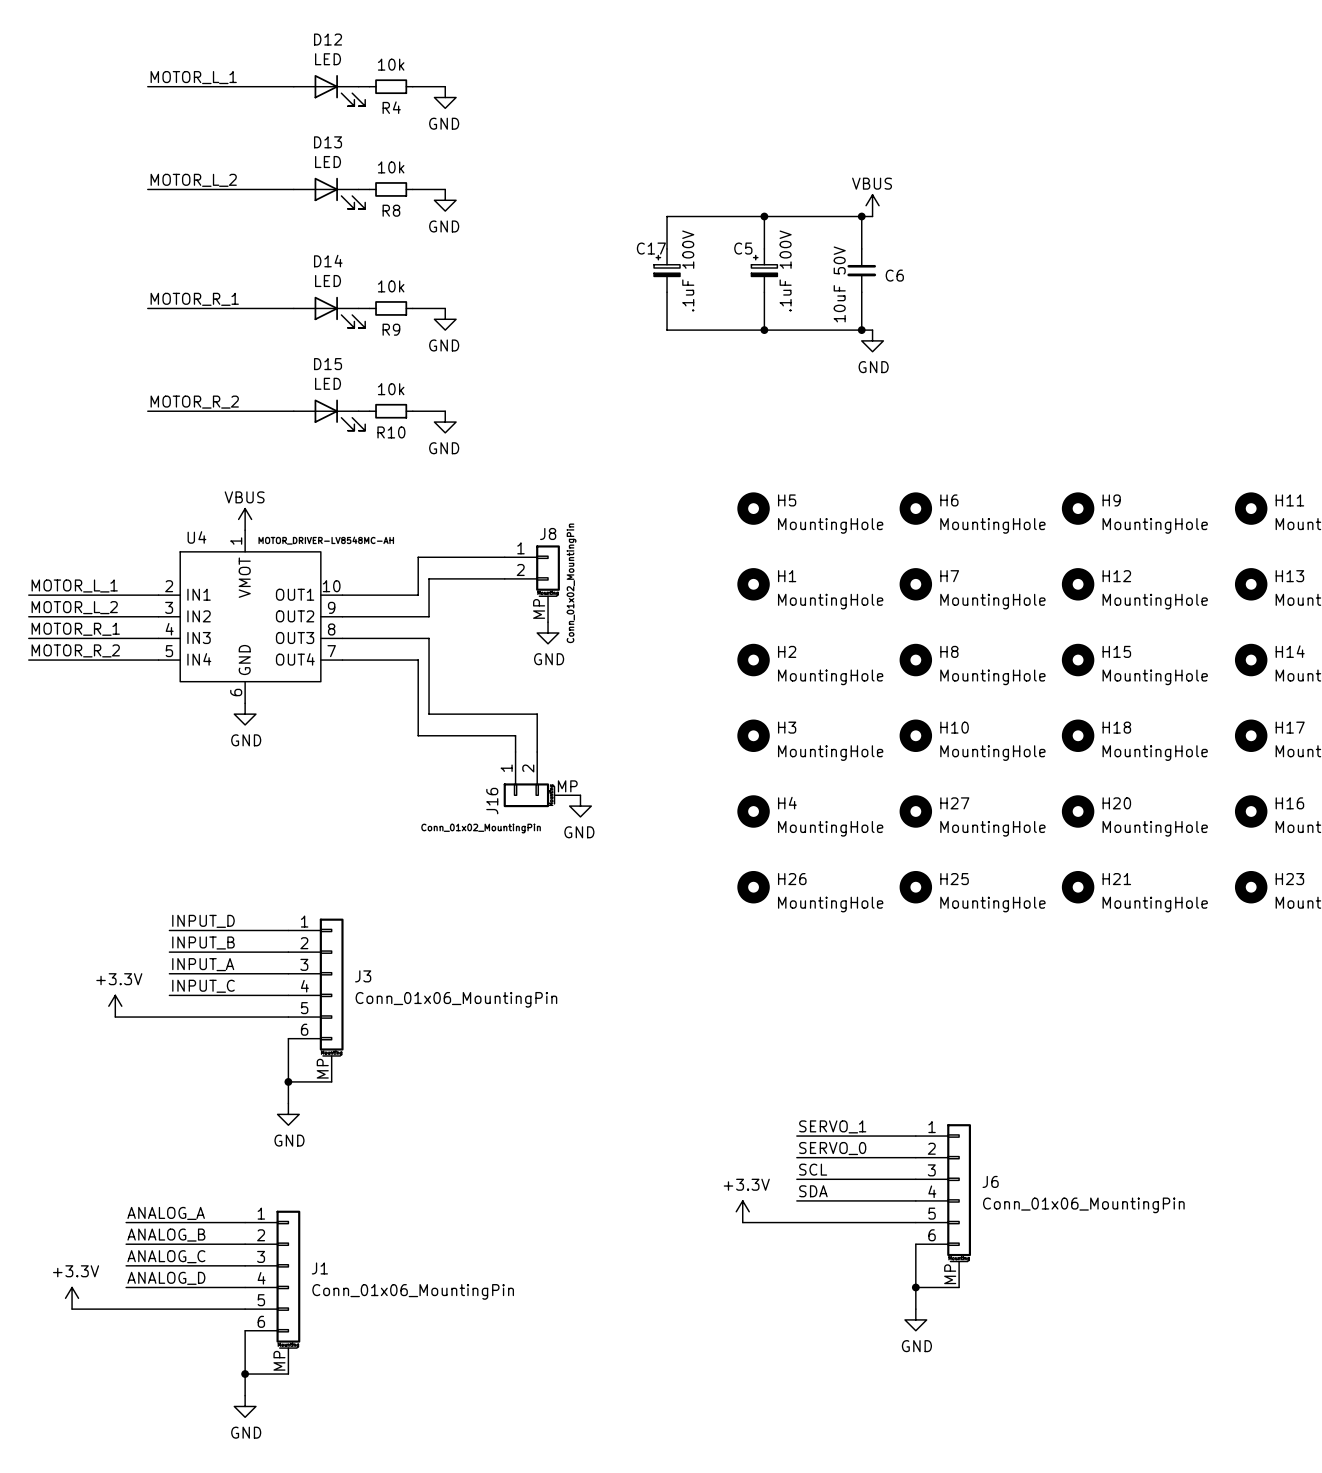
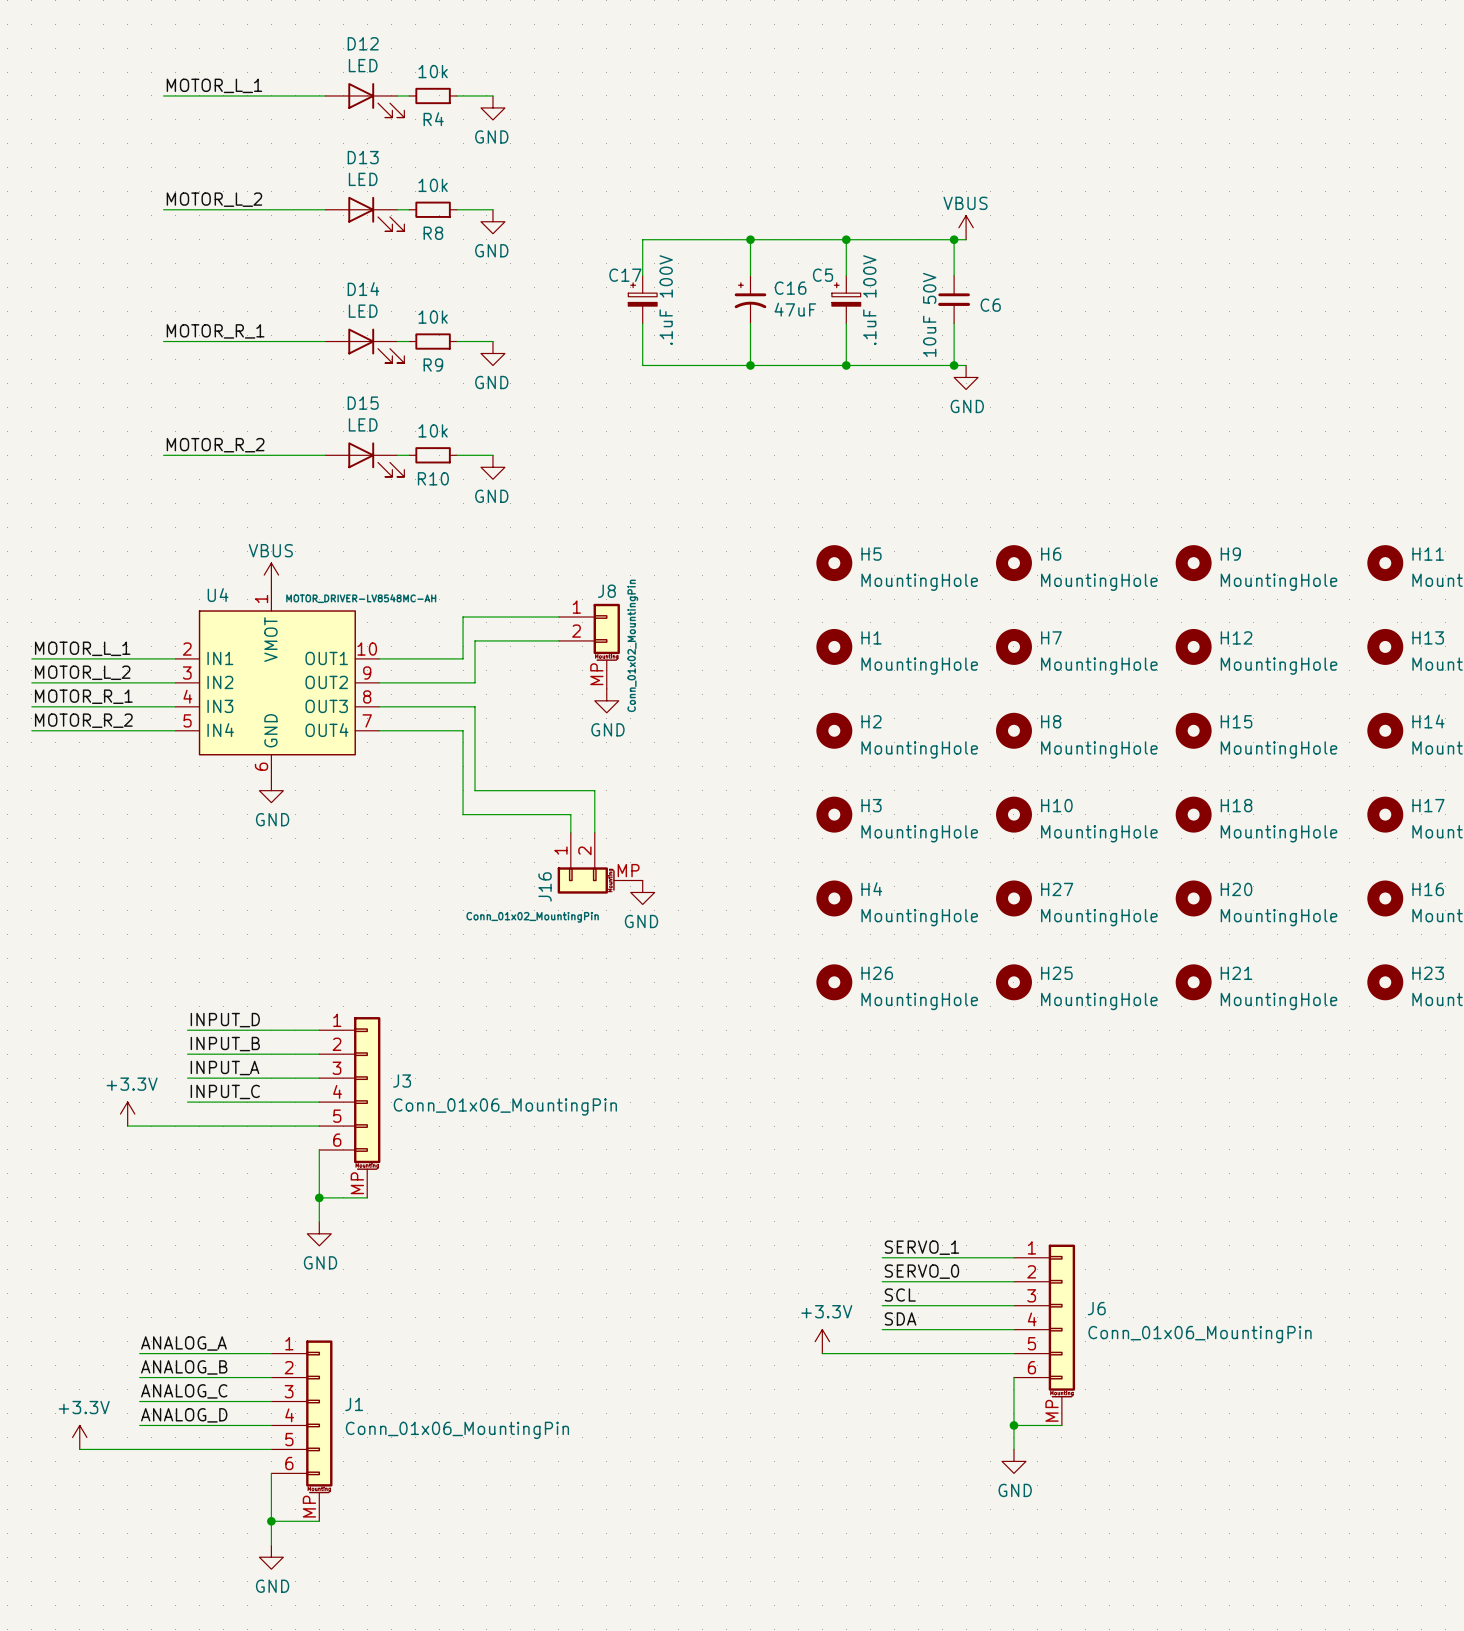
wire: (667, 216) (667, 248) -> (738, 239) (642, 239) (642, 275)
wire: none -> (750, 239) (750, 275)
junction: none -> (750, 239)
C17 position: (667, 270) -> (642, 299)
C16: none -> 47uF (750, 299)
wire: (667, 292) (667, 330) -> (642, 323) (642, 365) (738, 365)
wire: none -> (750, 323) (750, 365)
junction: none -> (750, 365)

